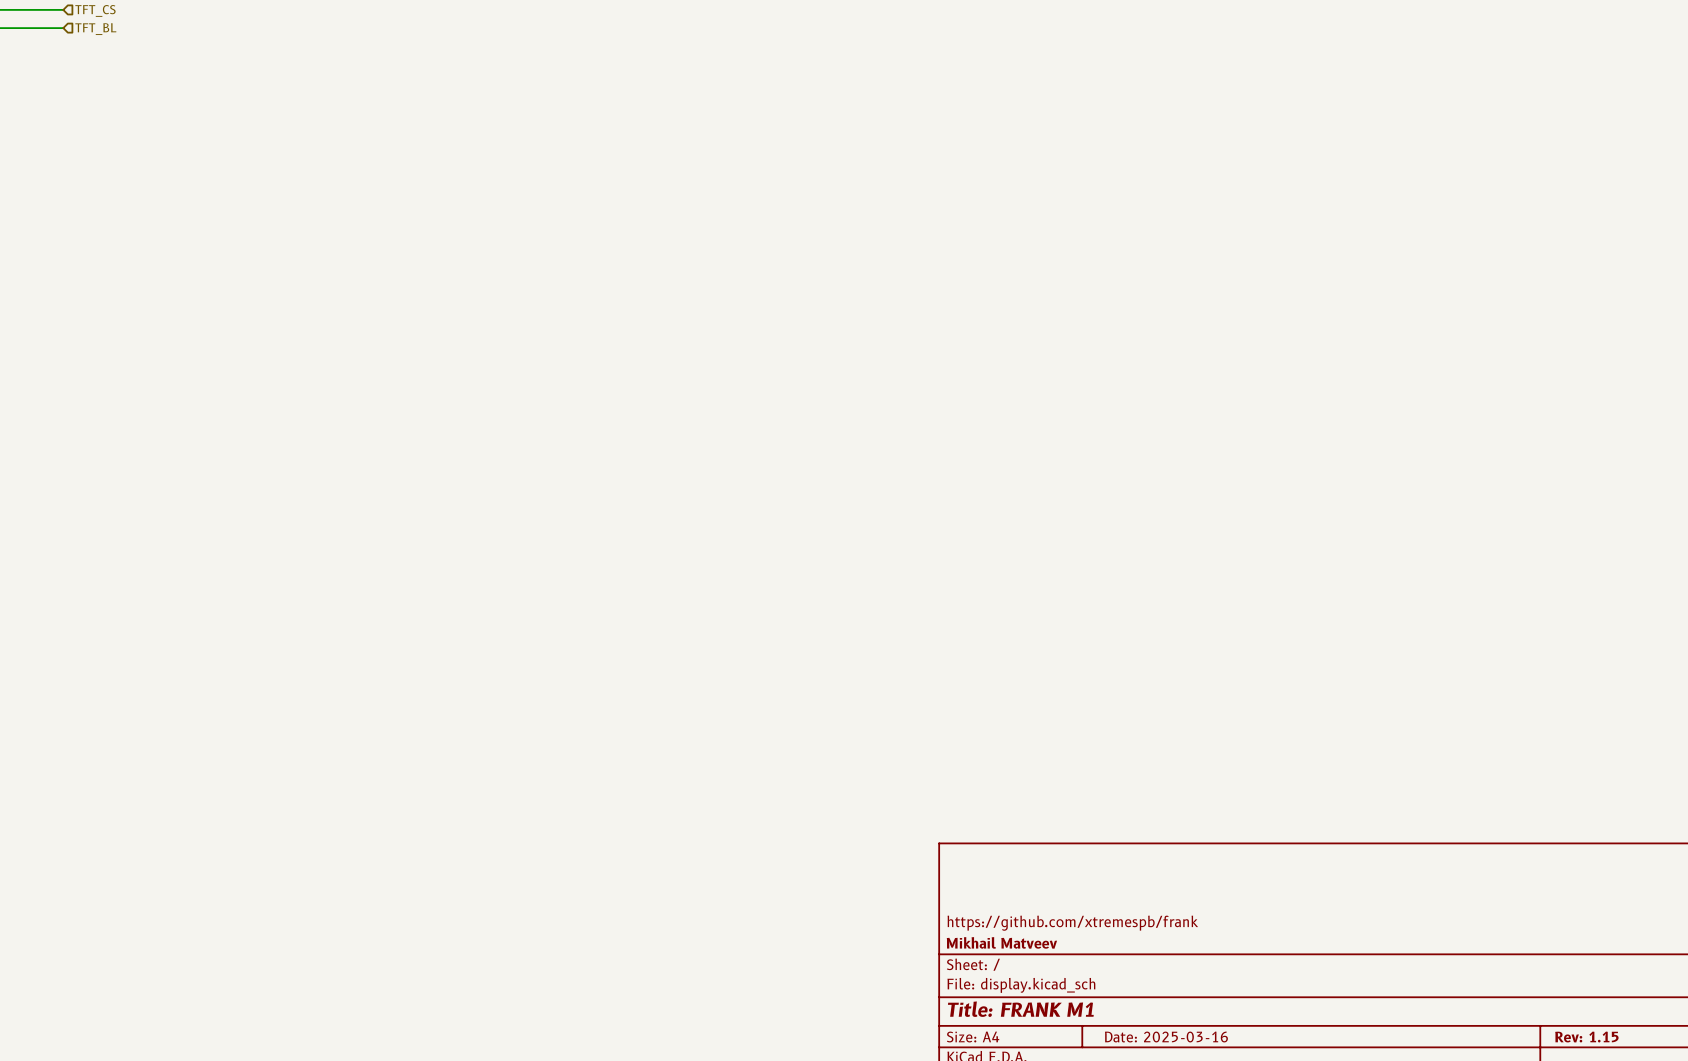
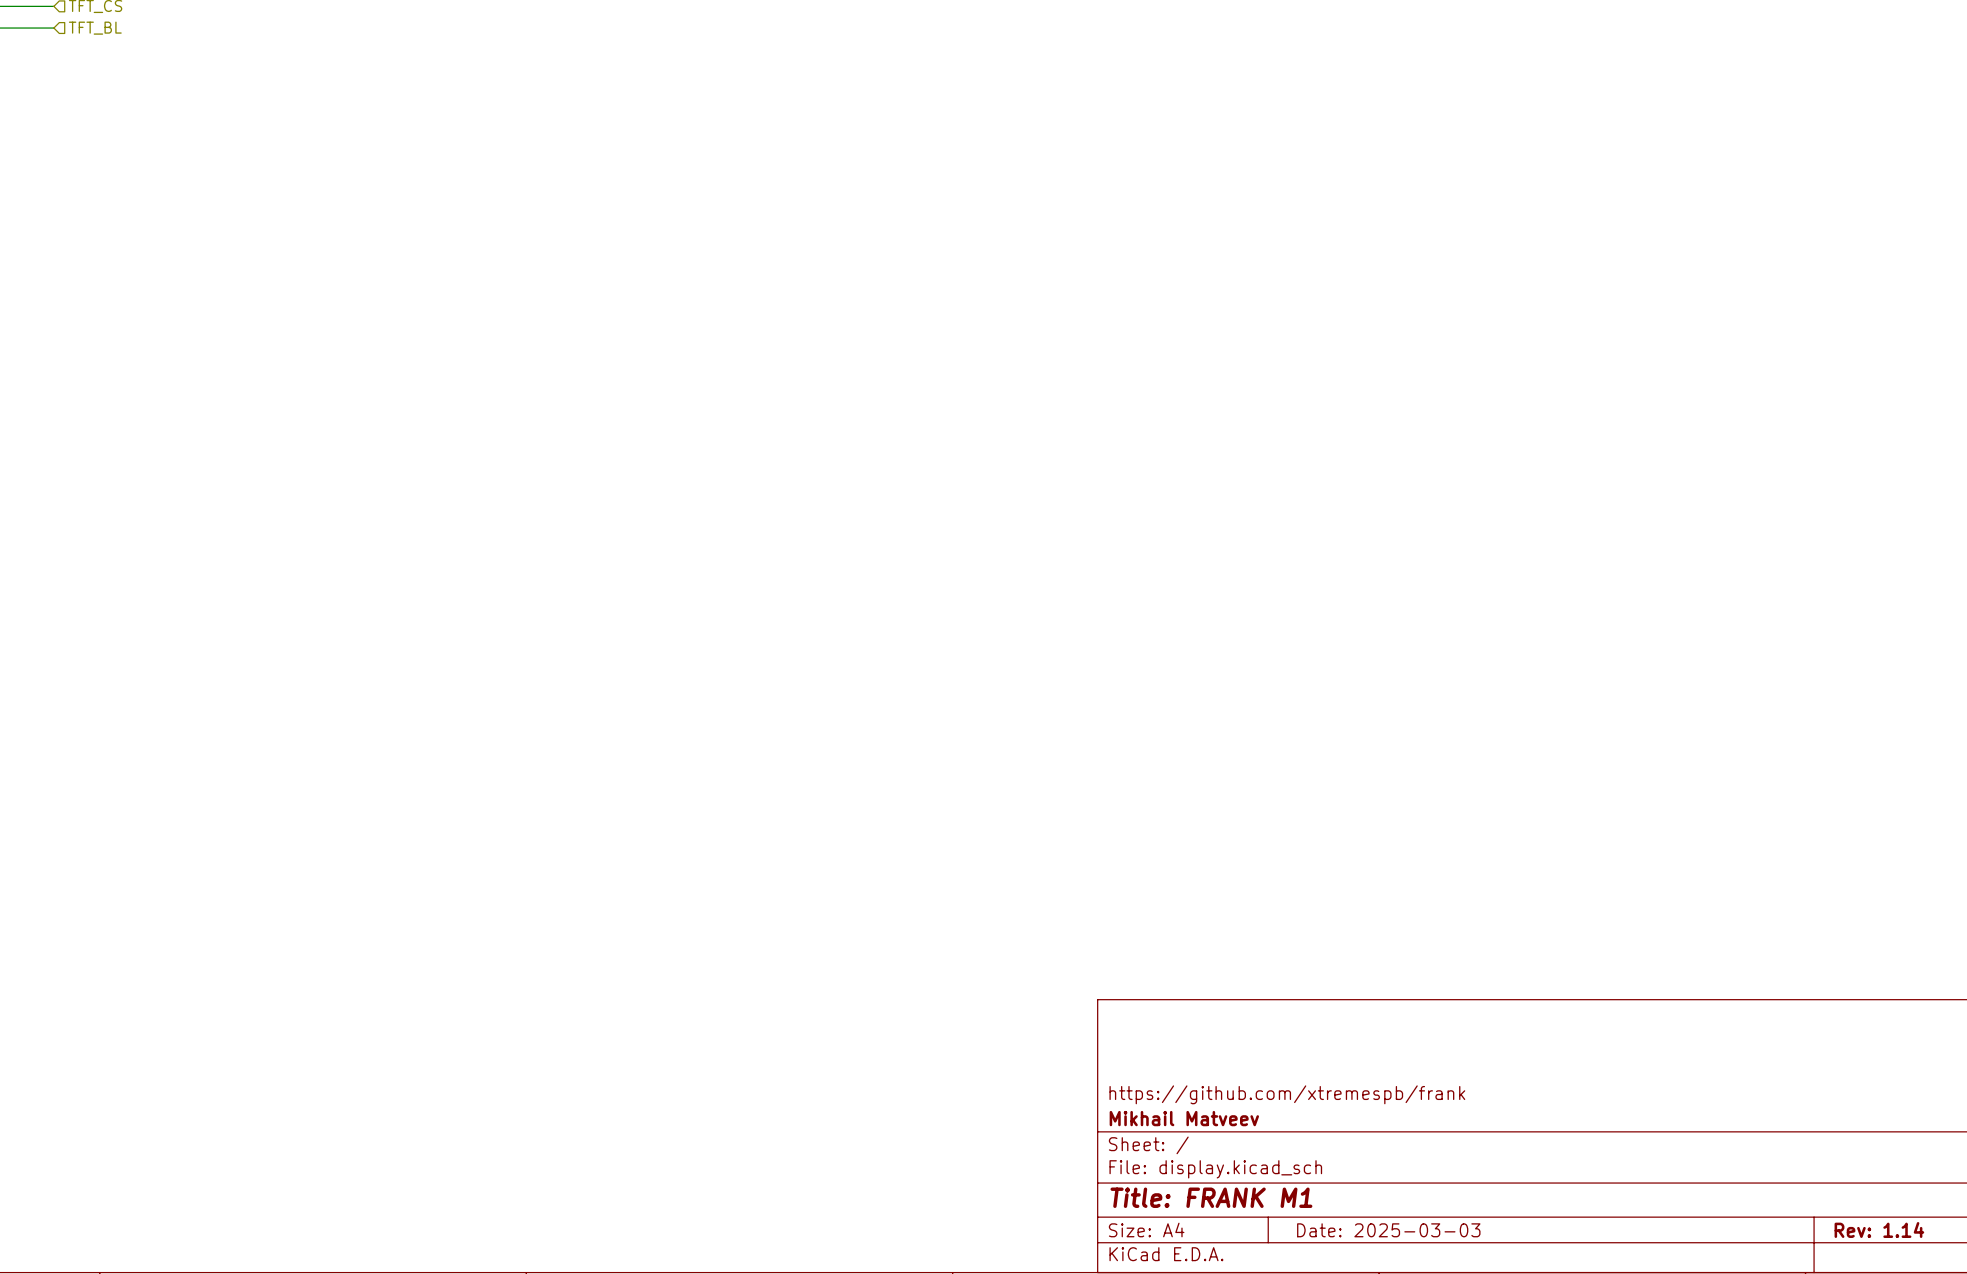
title block: Date: 2025-03-16 (1166, 1037) -> Date: 2025-03-03 (1388, 1230)
title block: Rev: 1.15 (1586, 1037) -> Rev: 1.14 (1879, 1230)

